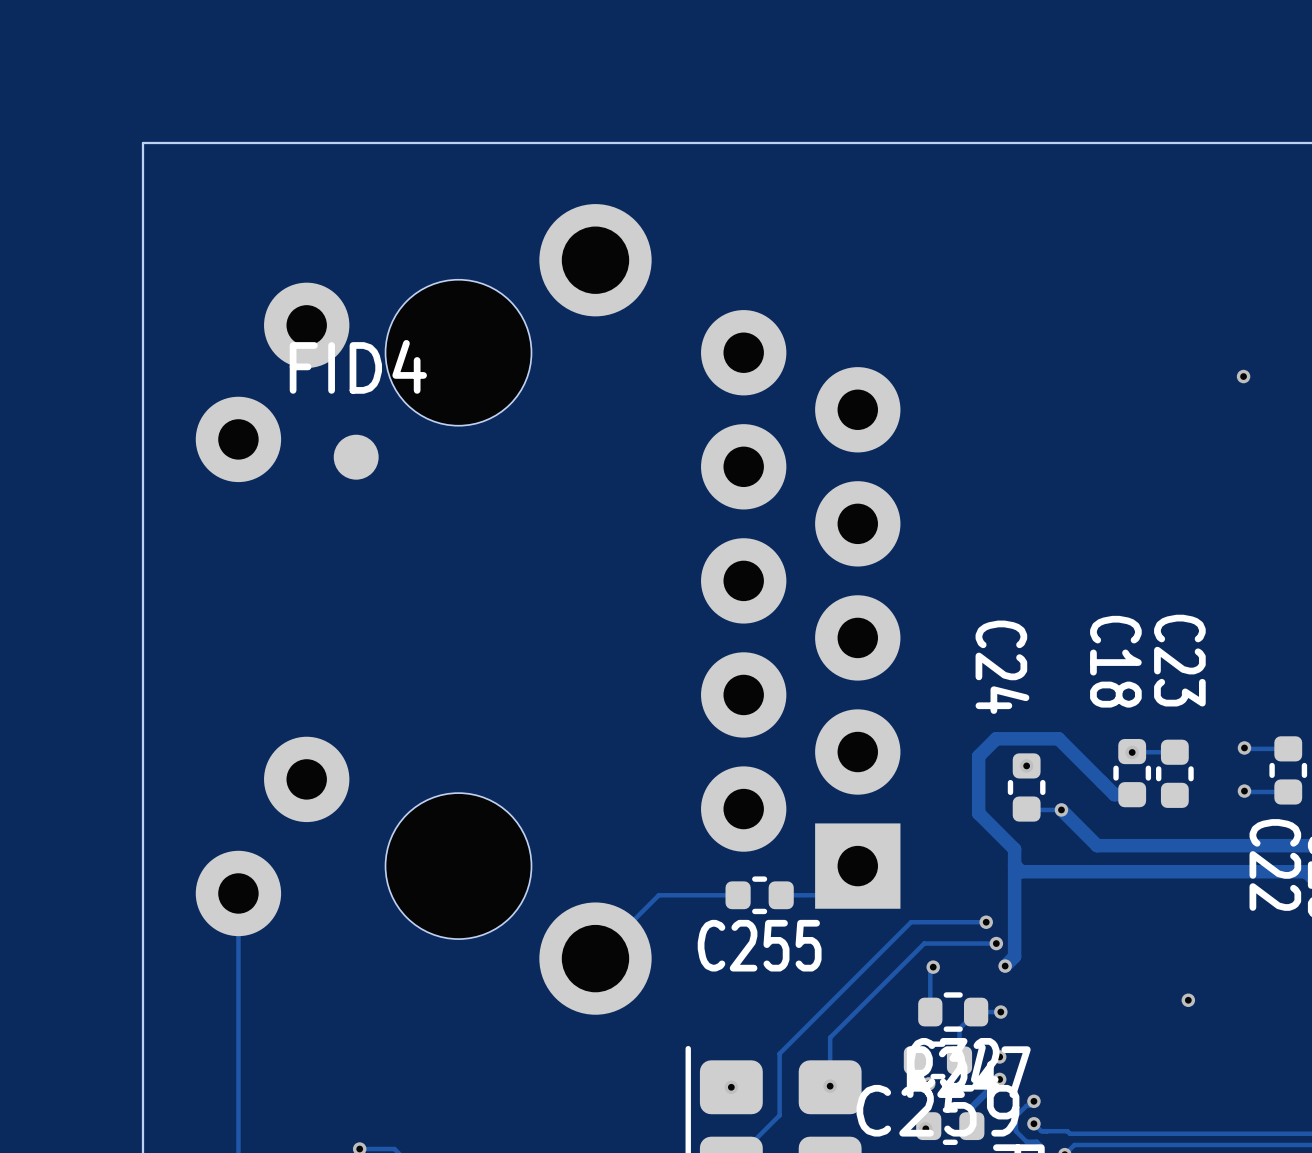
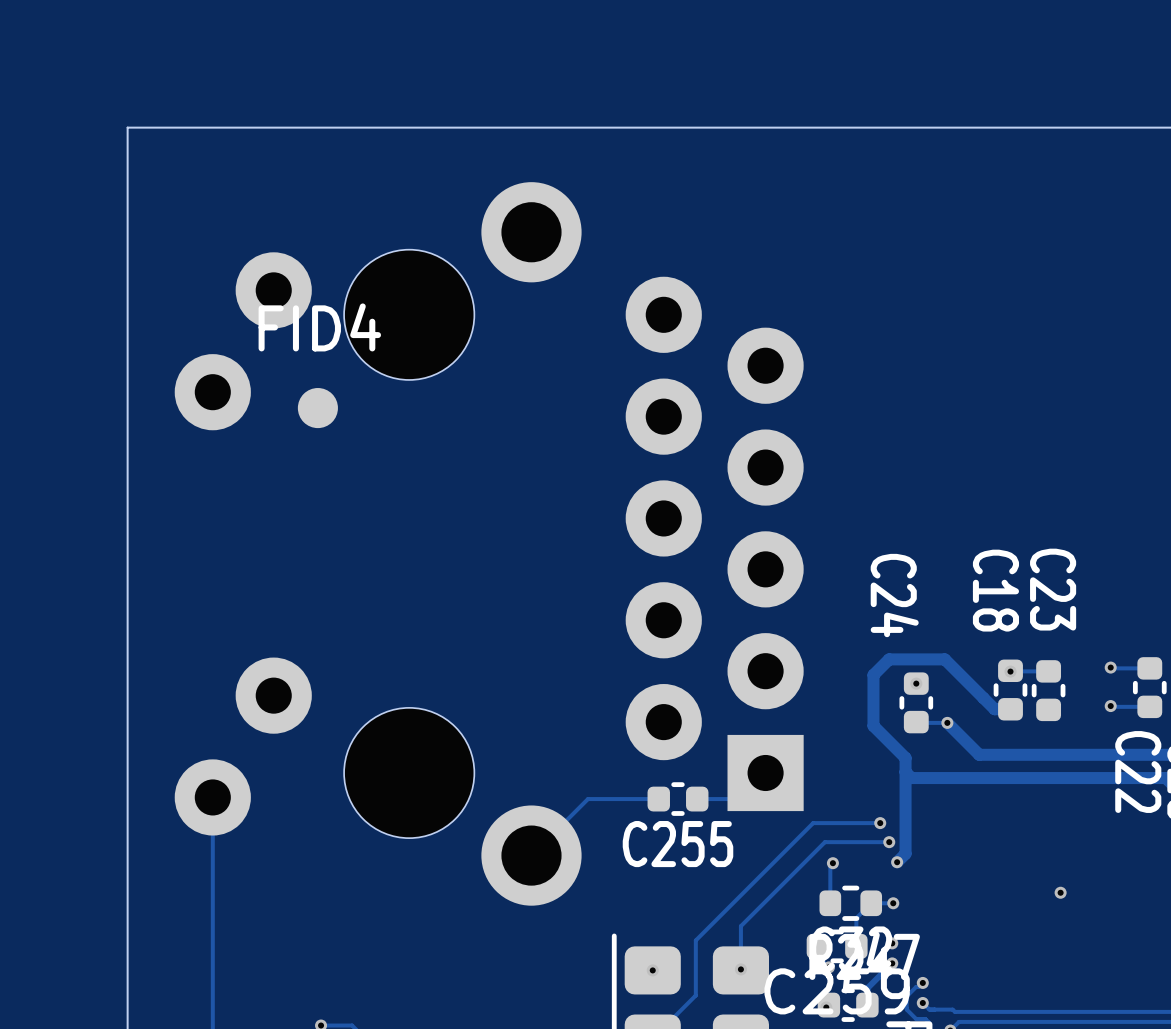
via: (1243, 376) -> none

